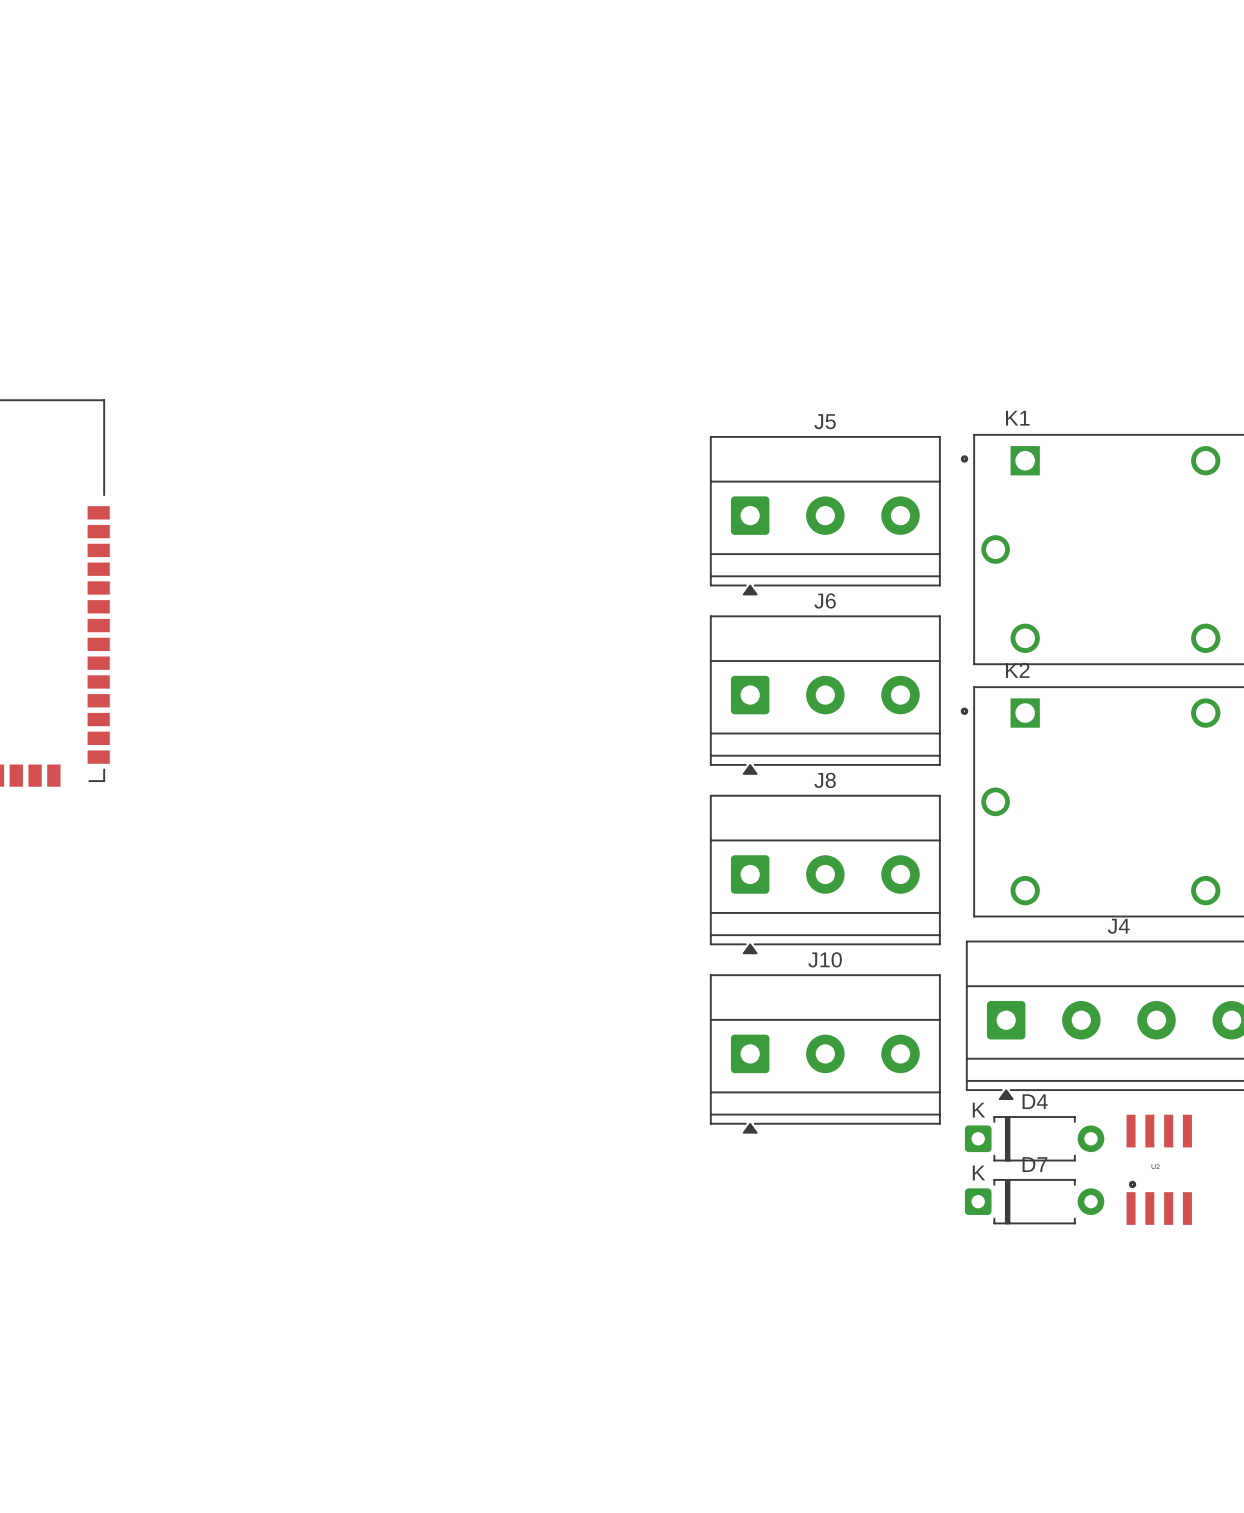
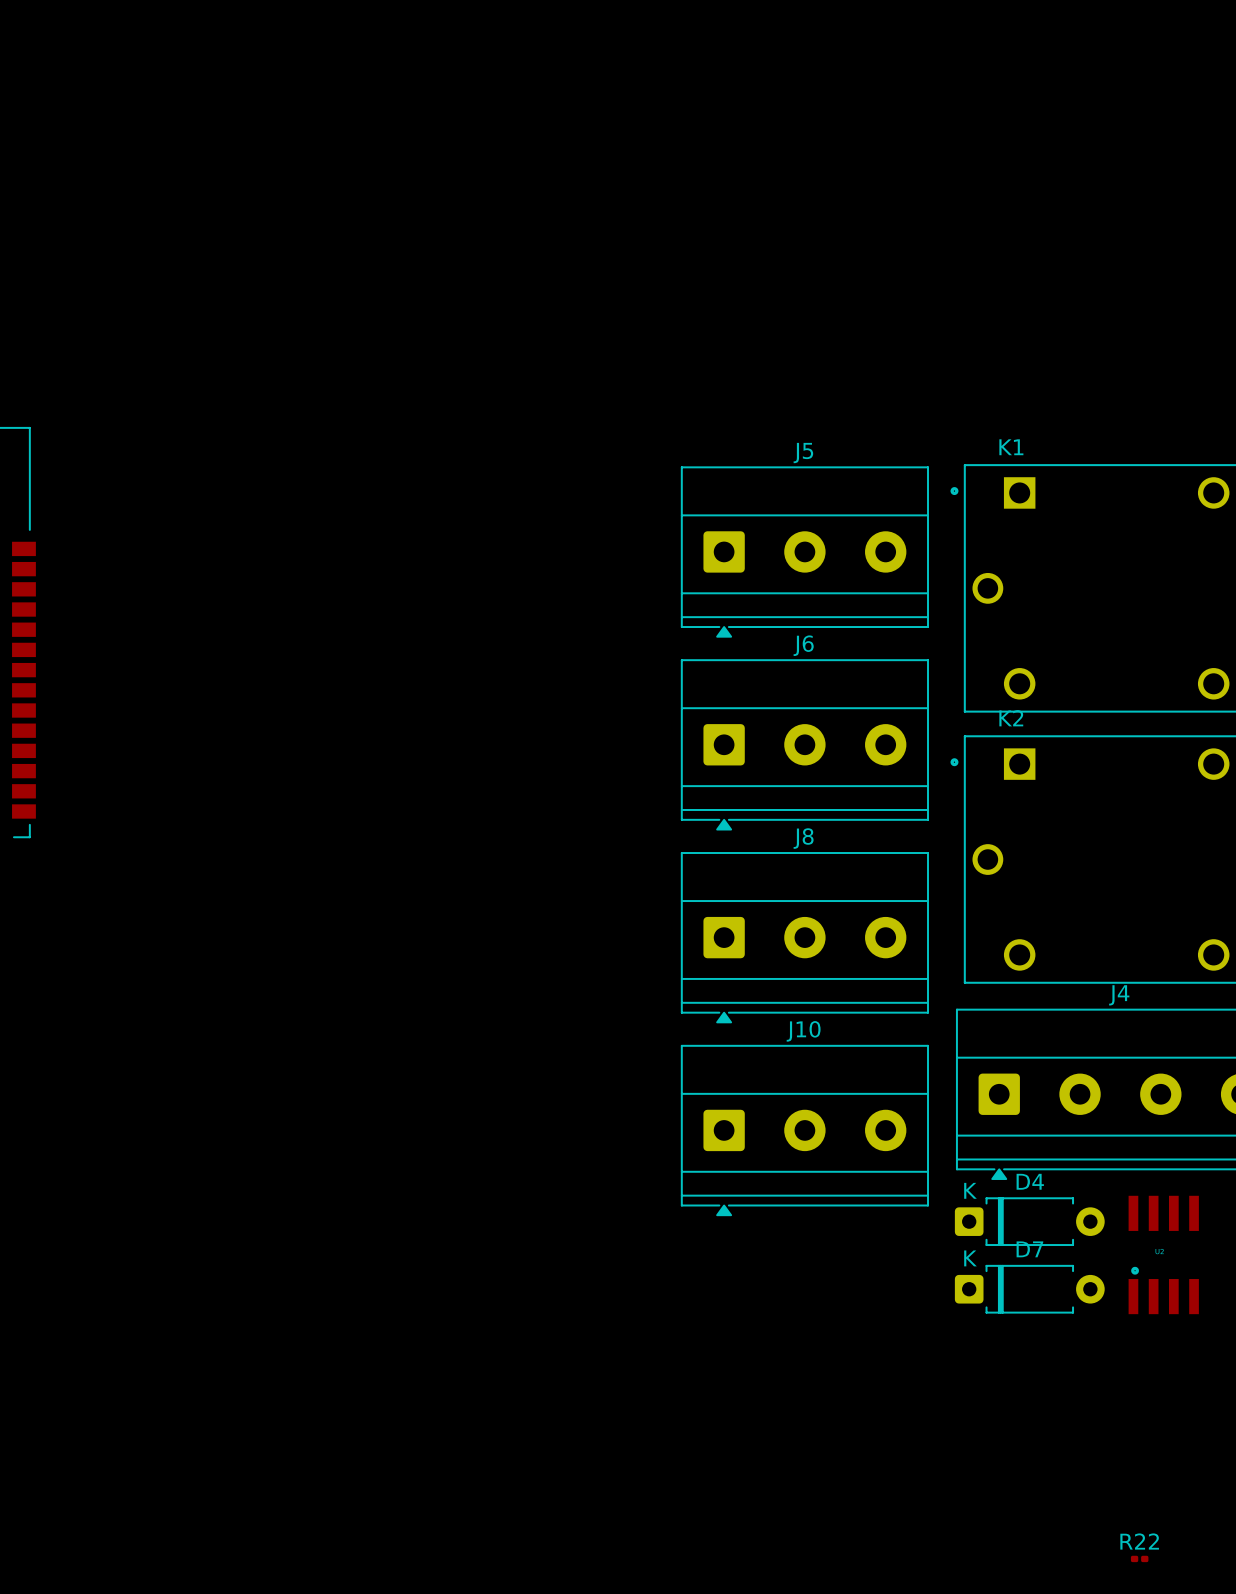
R22: none -> (1139, 1558)

